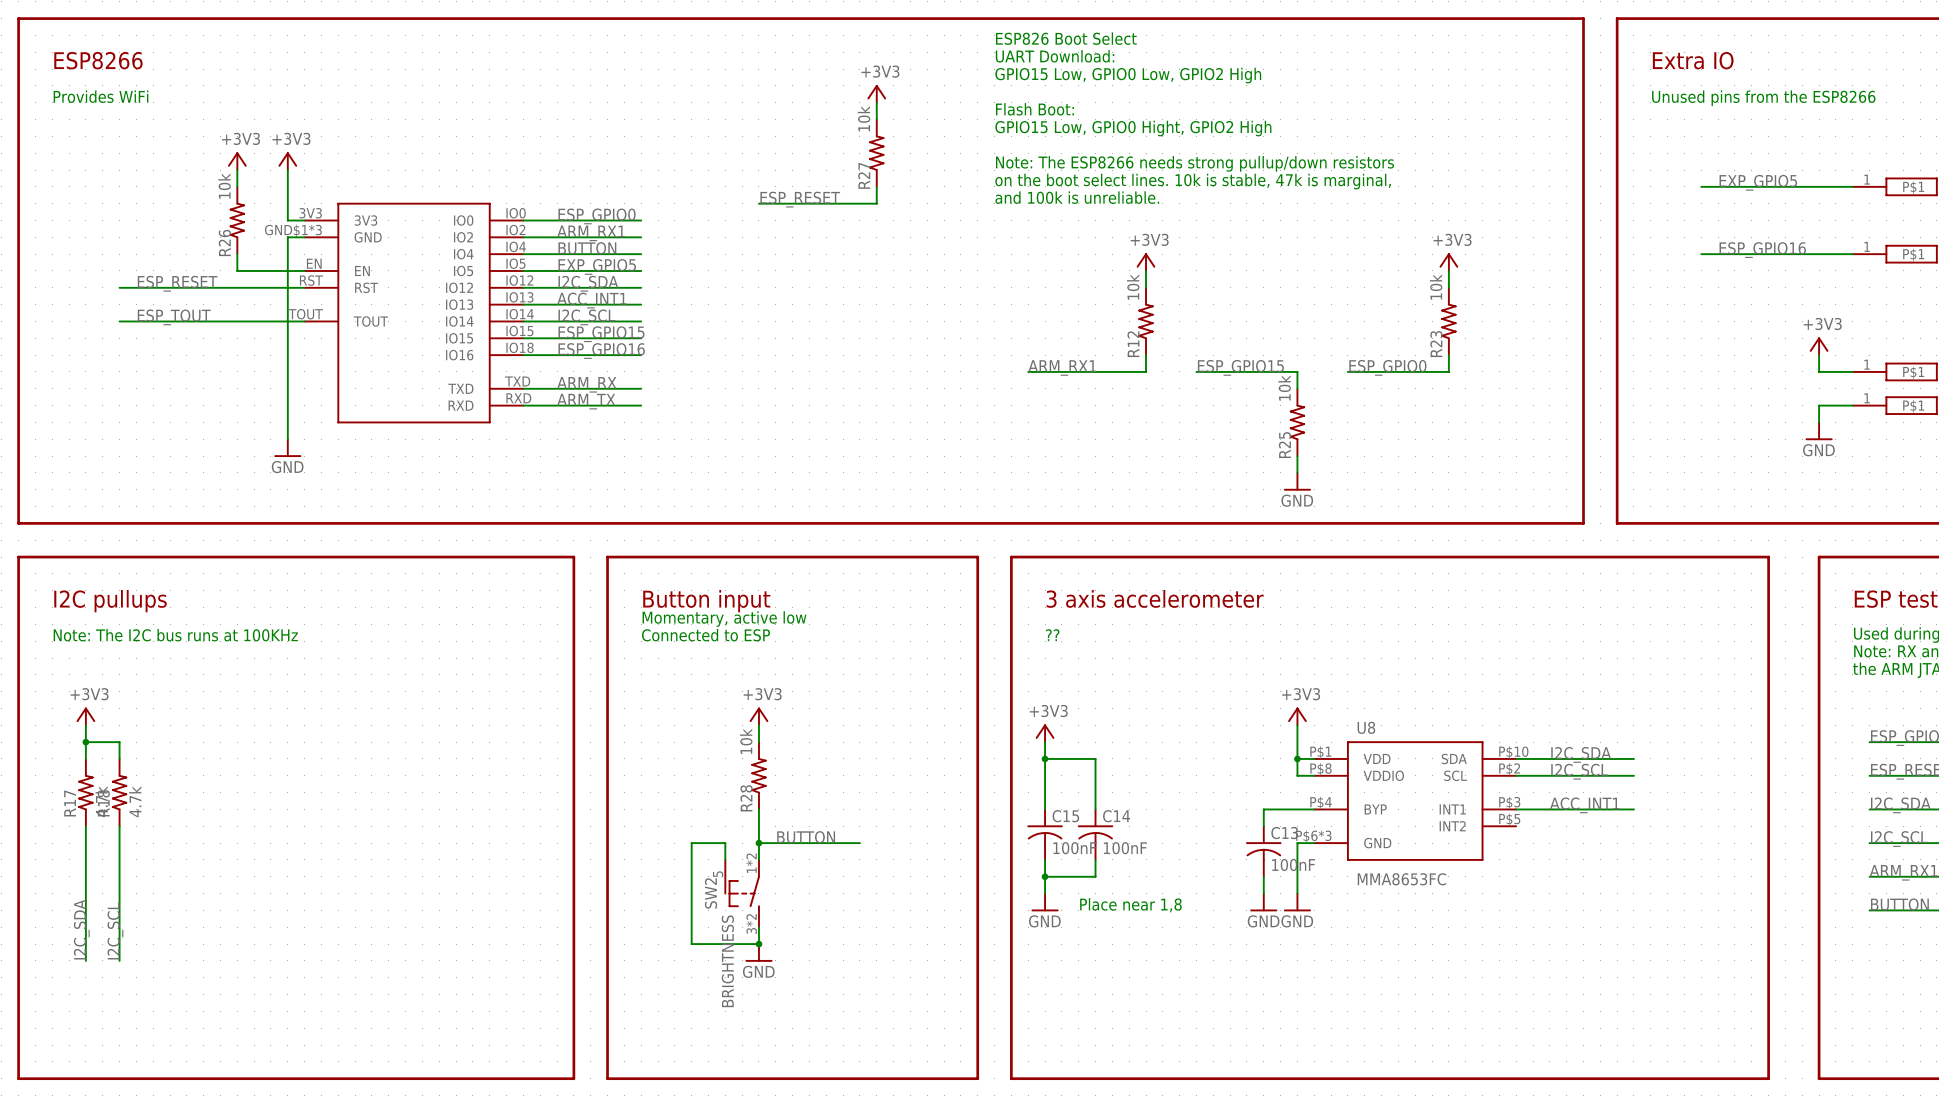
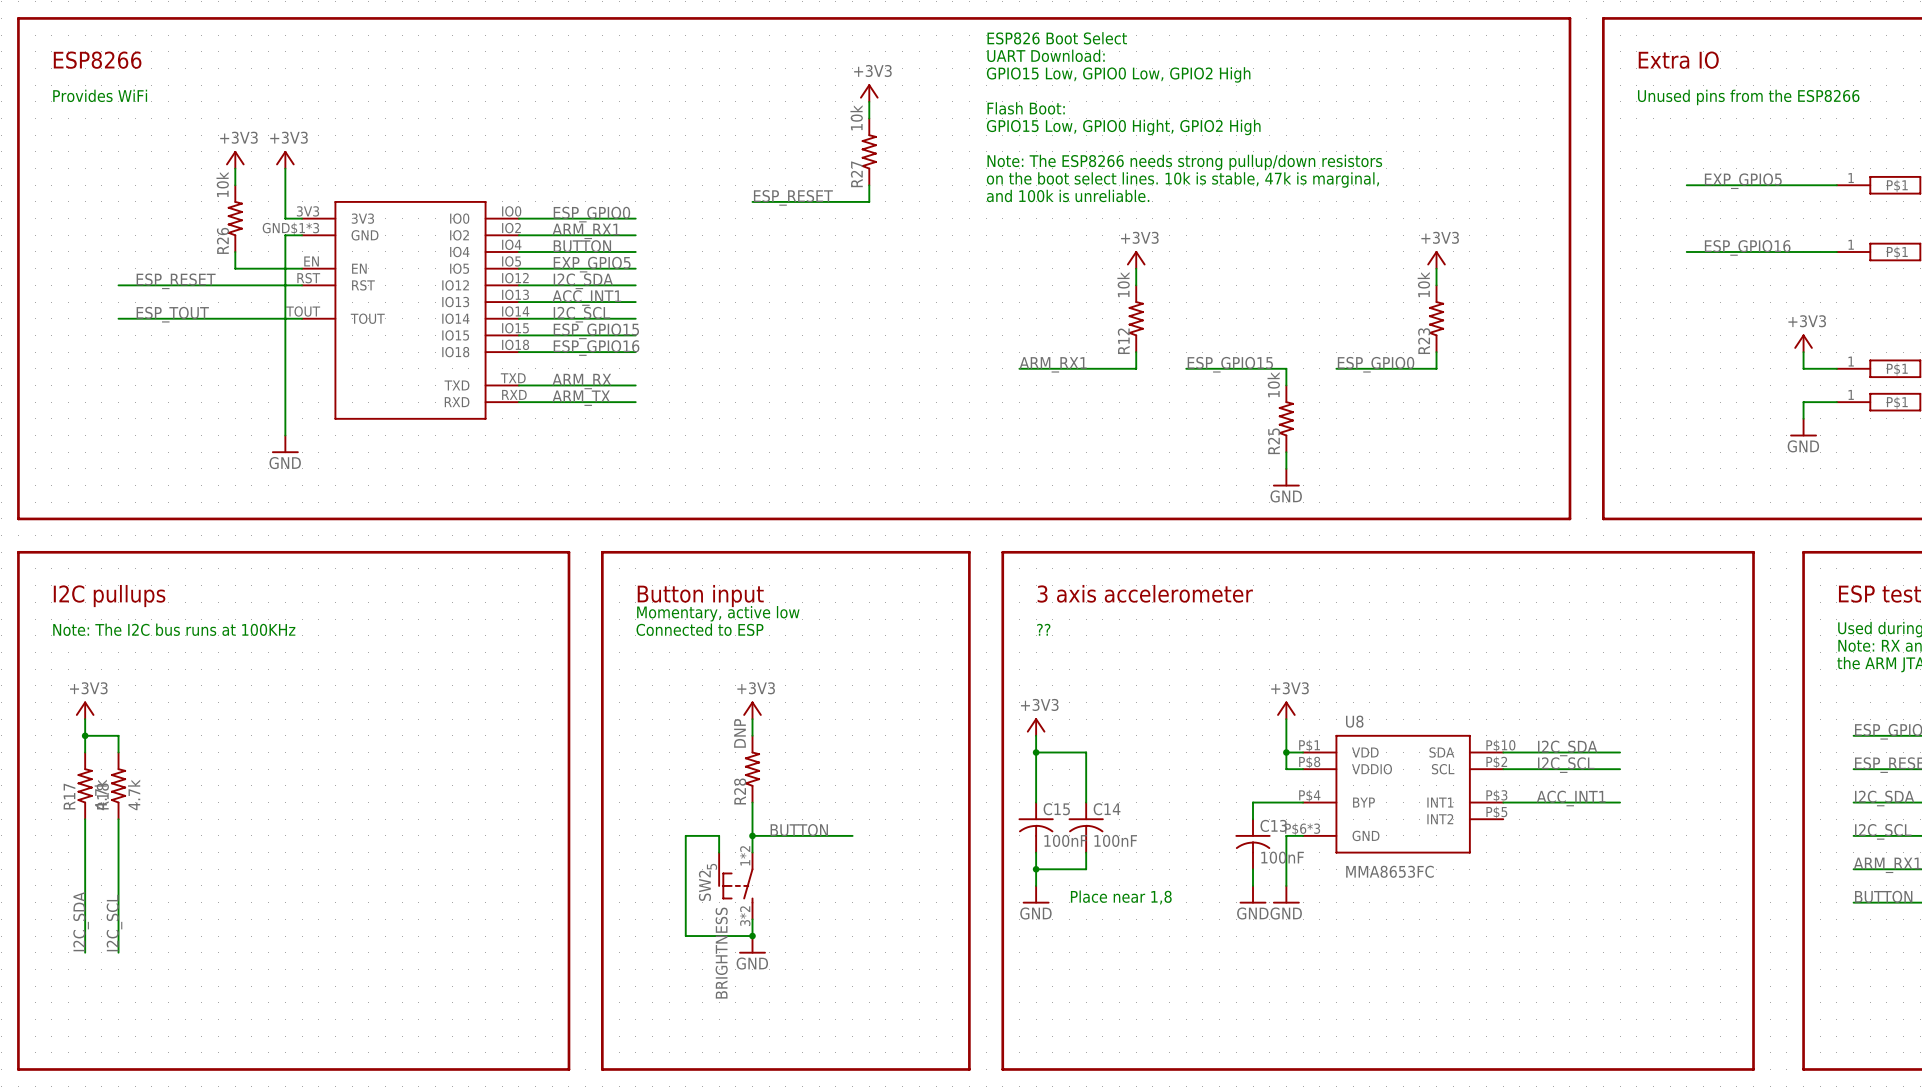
part pin name: IO16 (459, 355) -> IO18 (455, 352)
R28 value: 10k (746, 741) -> DNP (739, 733)

